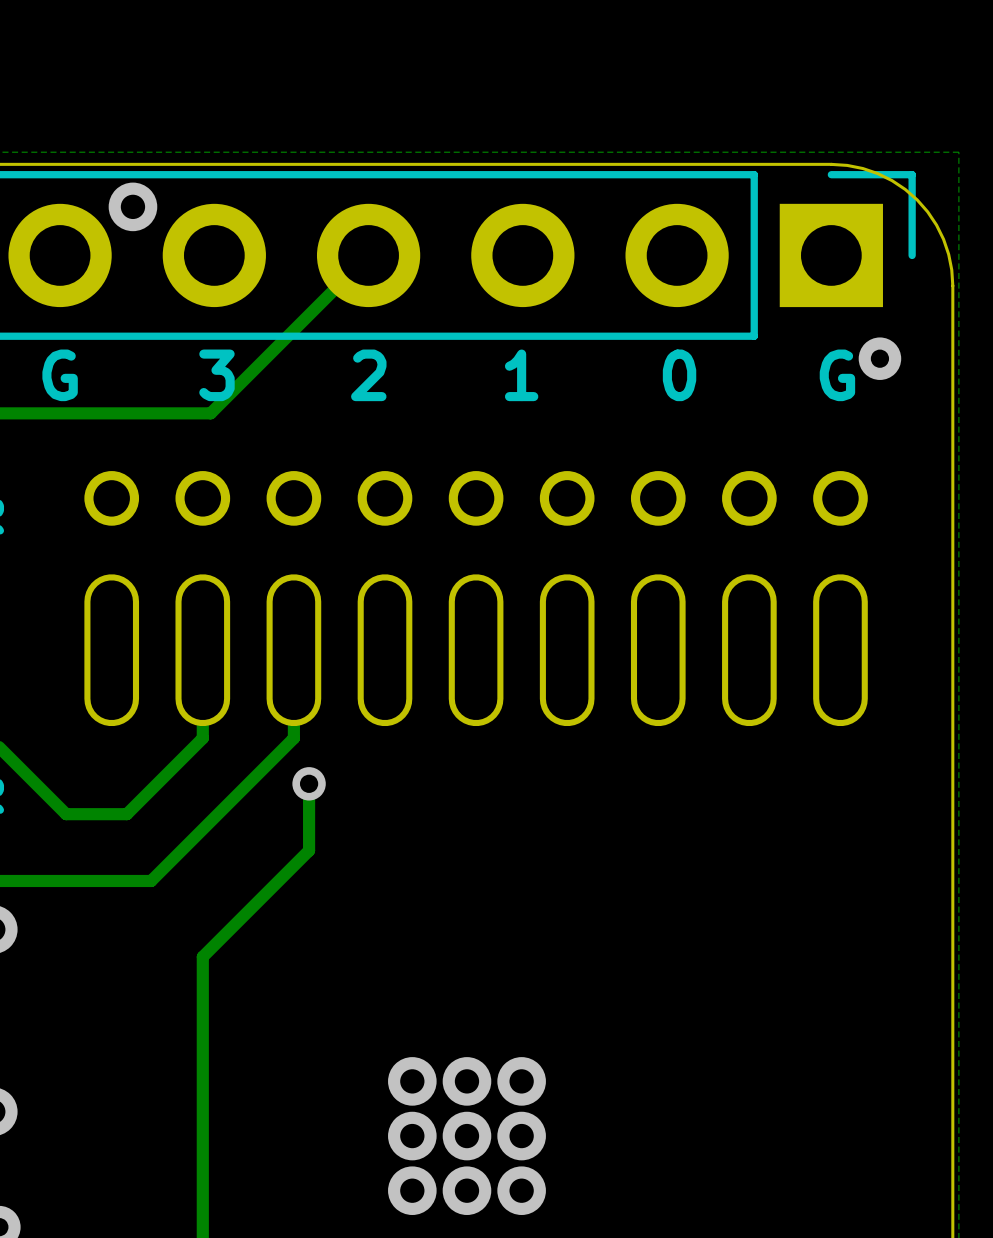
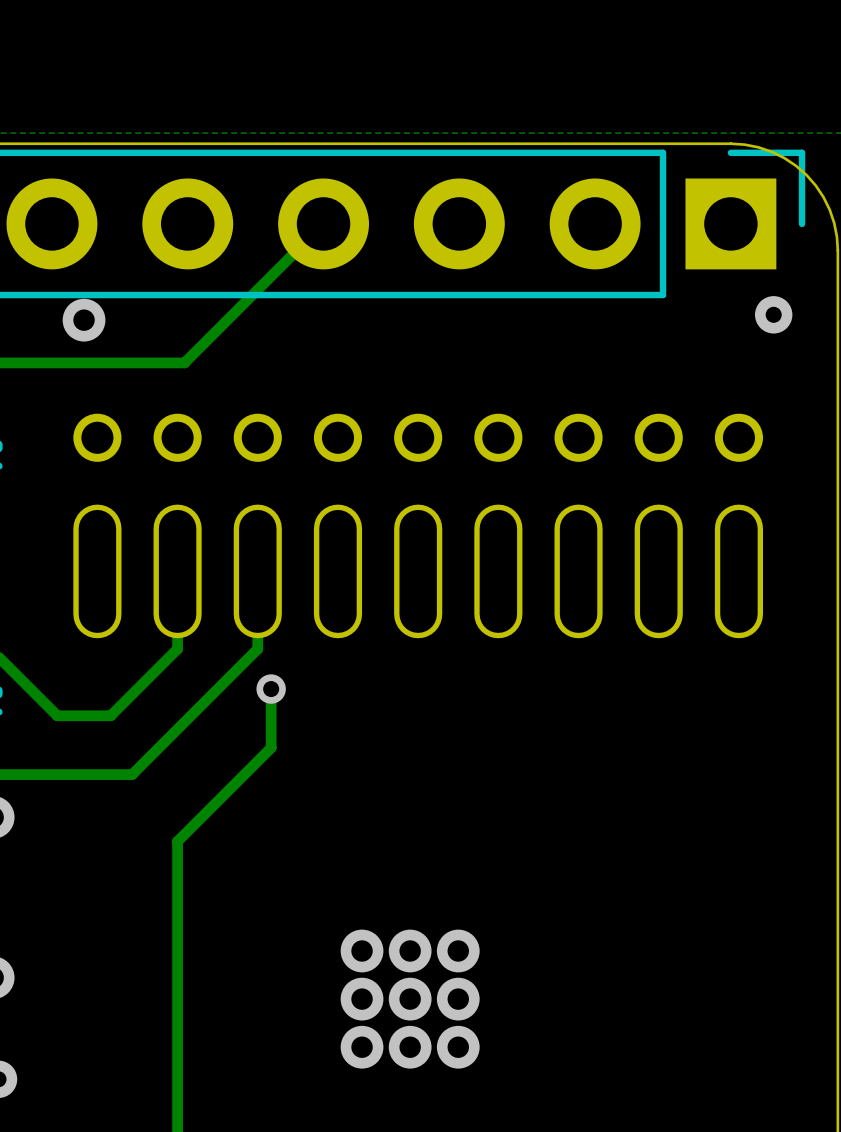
via position: (132, 206) -> (84, 320)
text: G (60, 375) -> none
text: 3 (216, 375) -> none
text: 2 (368, 375) -> none
text: 1 (521, 375) -> none
text: 0 (679, 375) -> none
text: G (837, 375) -> none

